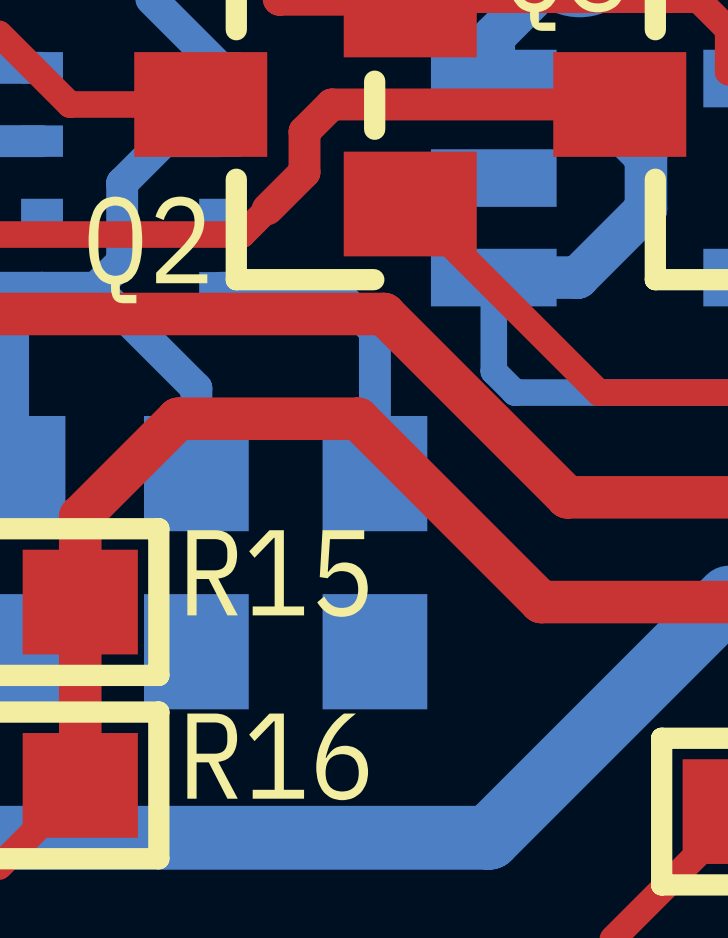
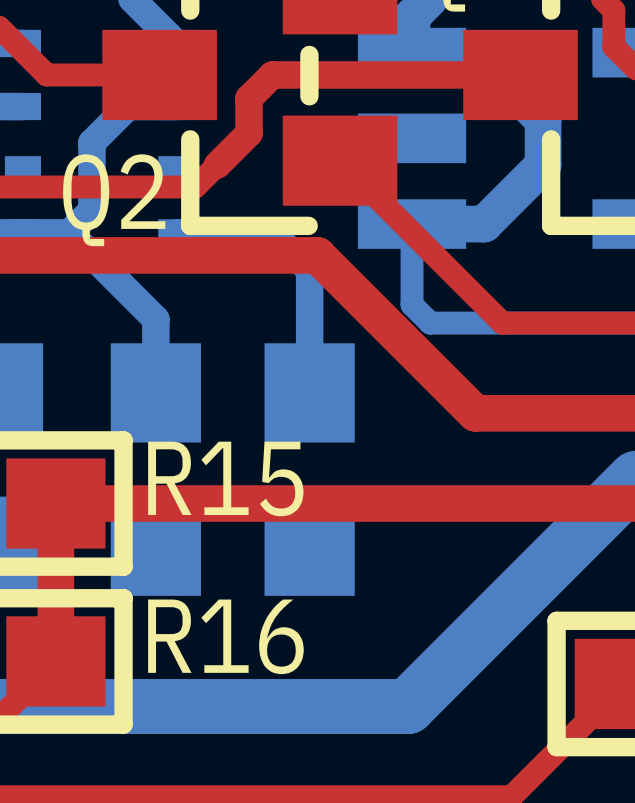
top track: (80, 602) (80, 516) (178, 418) (357, 418) (541, 602) -> (55, 503) (452, 503)

